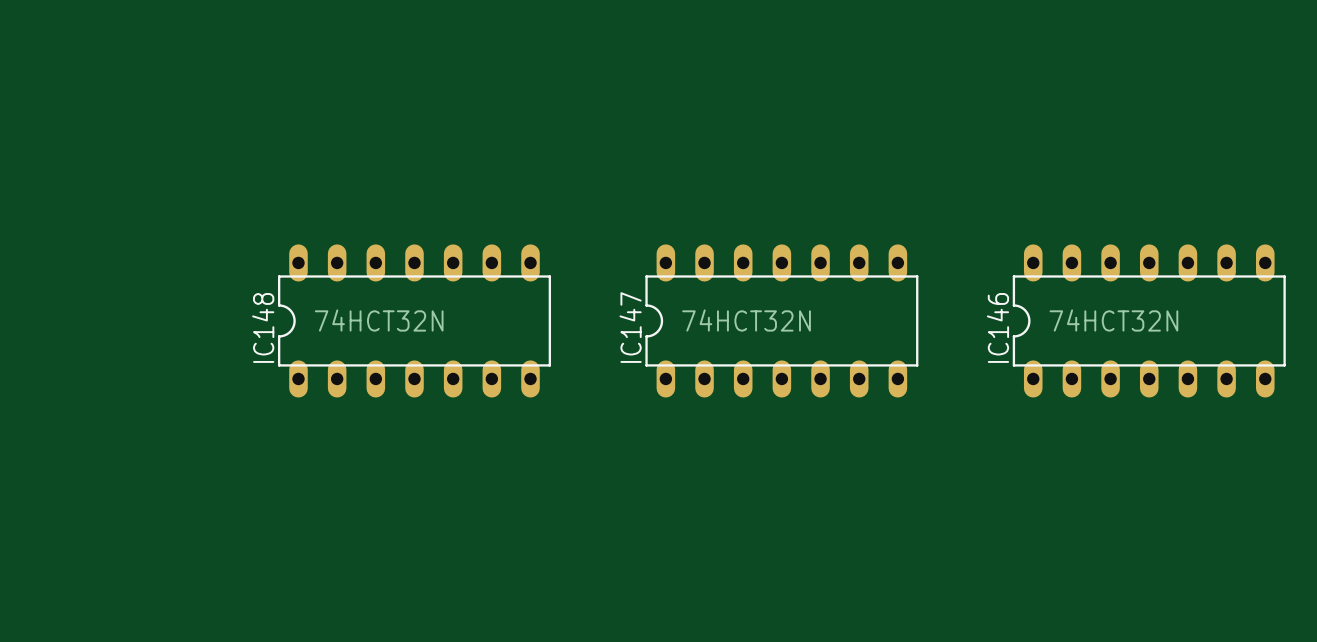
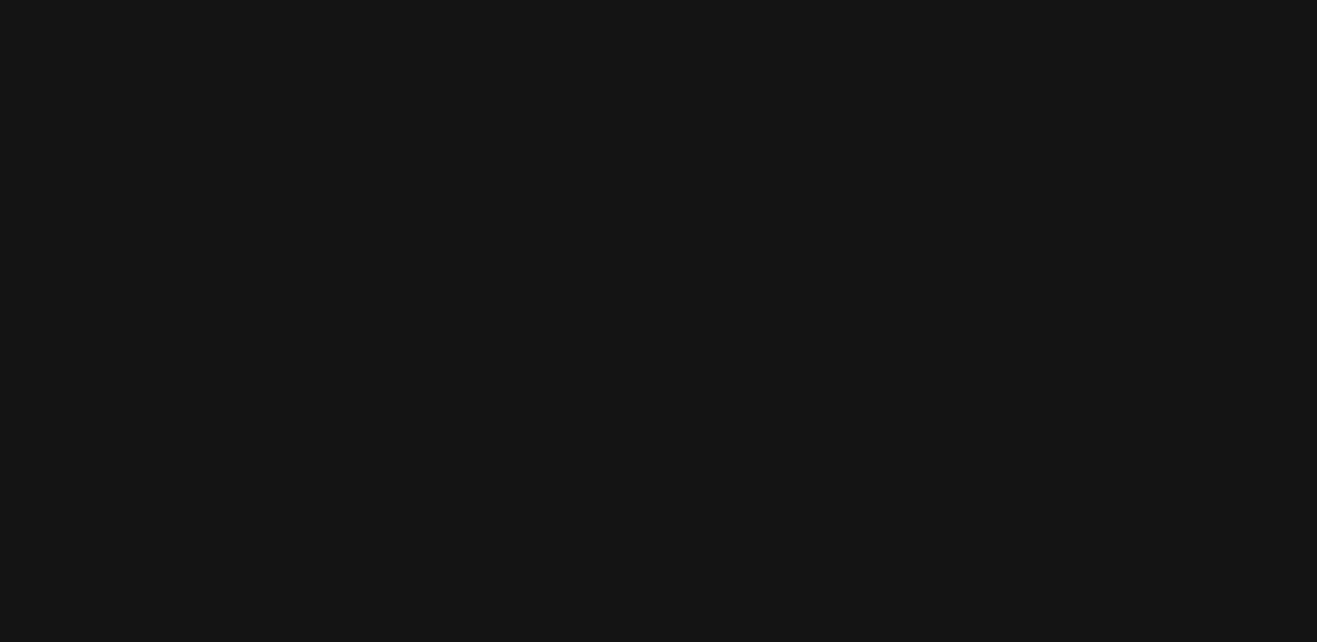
IC148: 74HCT32N (414, 320) -> none
IC147: 74HCT32N (781, 320) -> none
IC146: 74HCT32N (1149, 320) -> none

